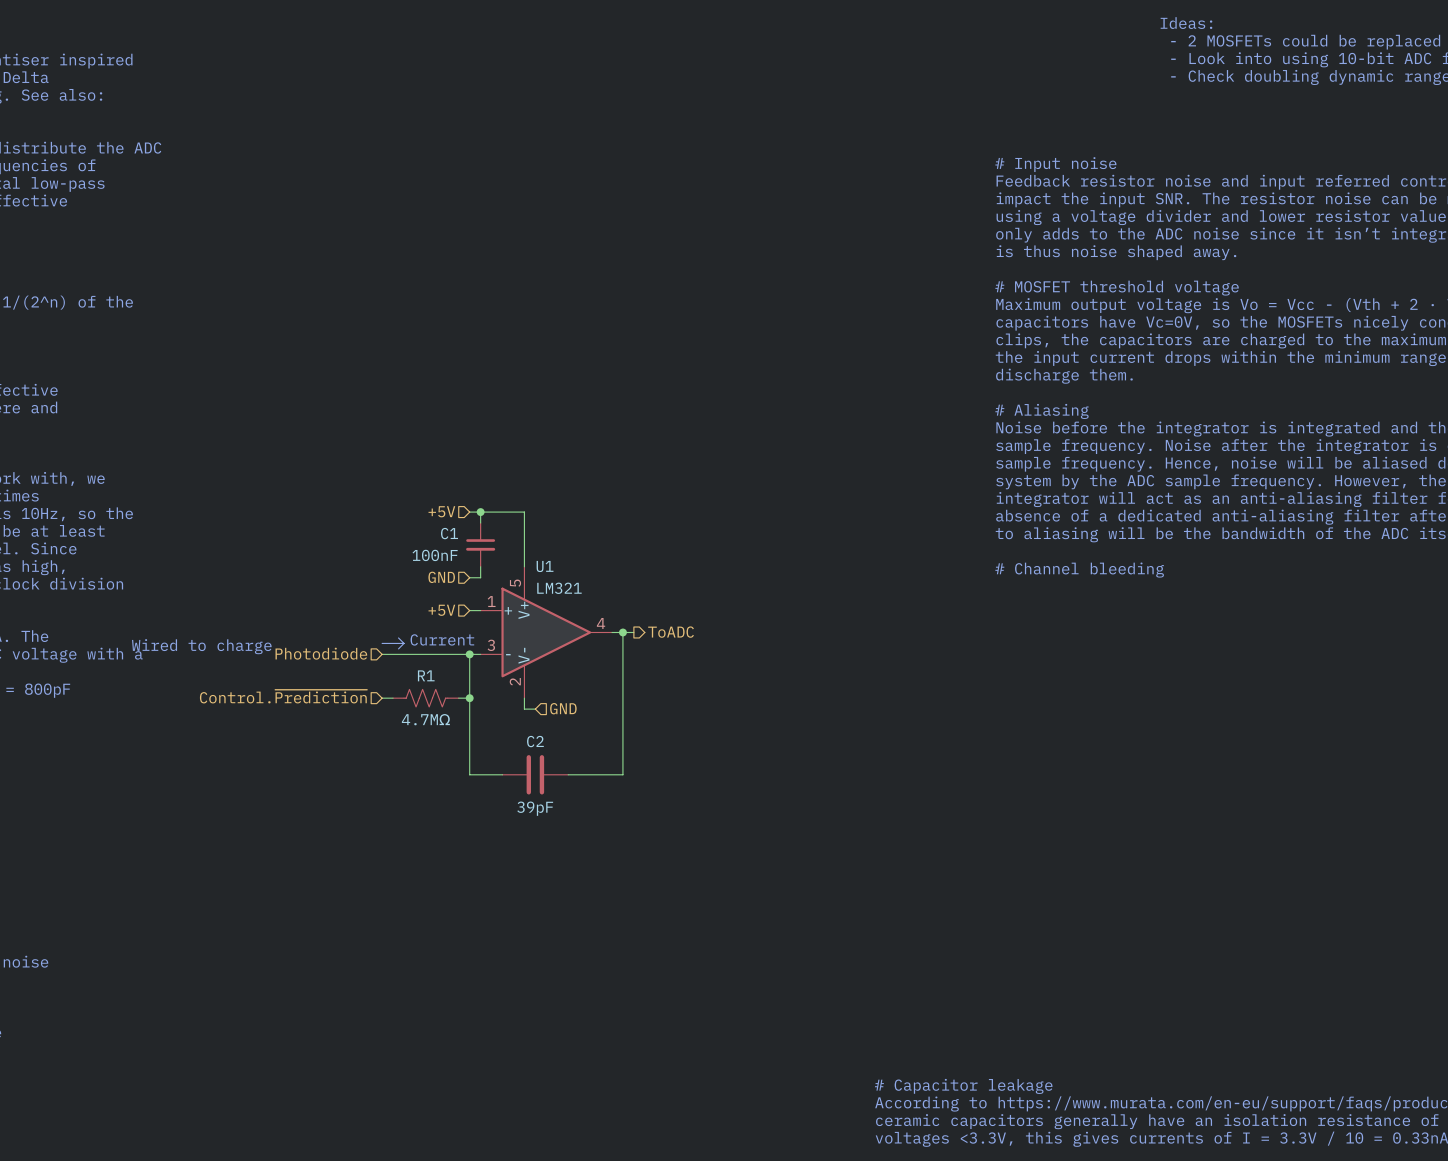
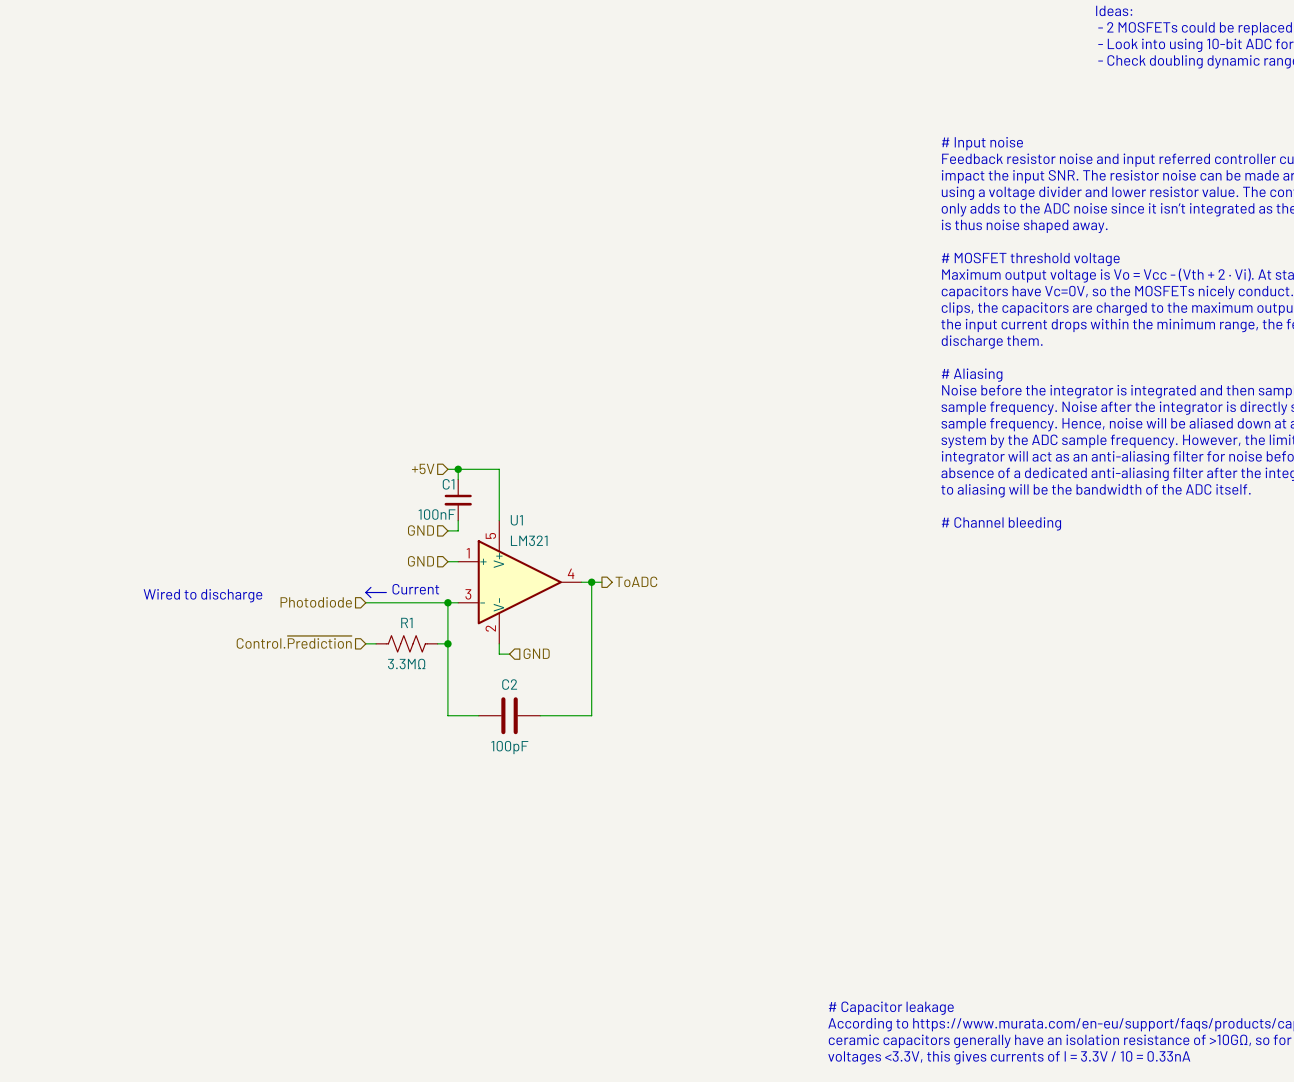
C1 name position: C1 (449, 533) -> C1 (448, 484)
C1 value position: 100nF (435, 555) -> 100nF (437, 514)
hierarchical label: +5V (441, 610) -> GND (420, 561)
bus: none -> (370, 587) (365, 592) (370, 597)
bus: (398, 637) (404, 643) (398, 648) -> none
text: Wired to charge (201, 646) -> Wired to discharge (202, 595)
R1 value: 4.7MΩ (425, 719) -> 3.3MΩ (406, 664)
C2 value: 39pF (535, 808) -> 100pF (509, 747)

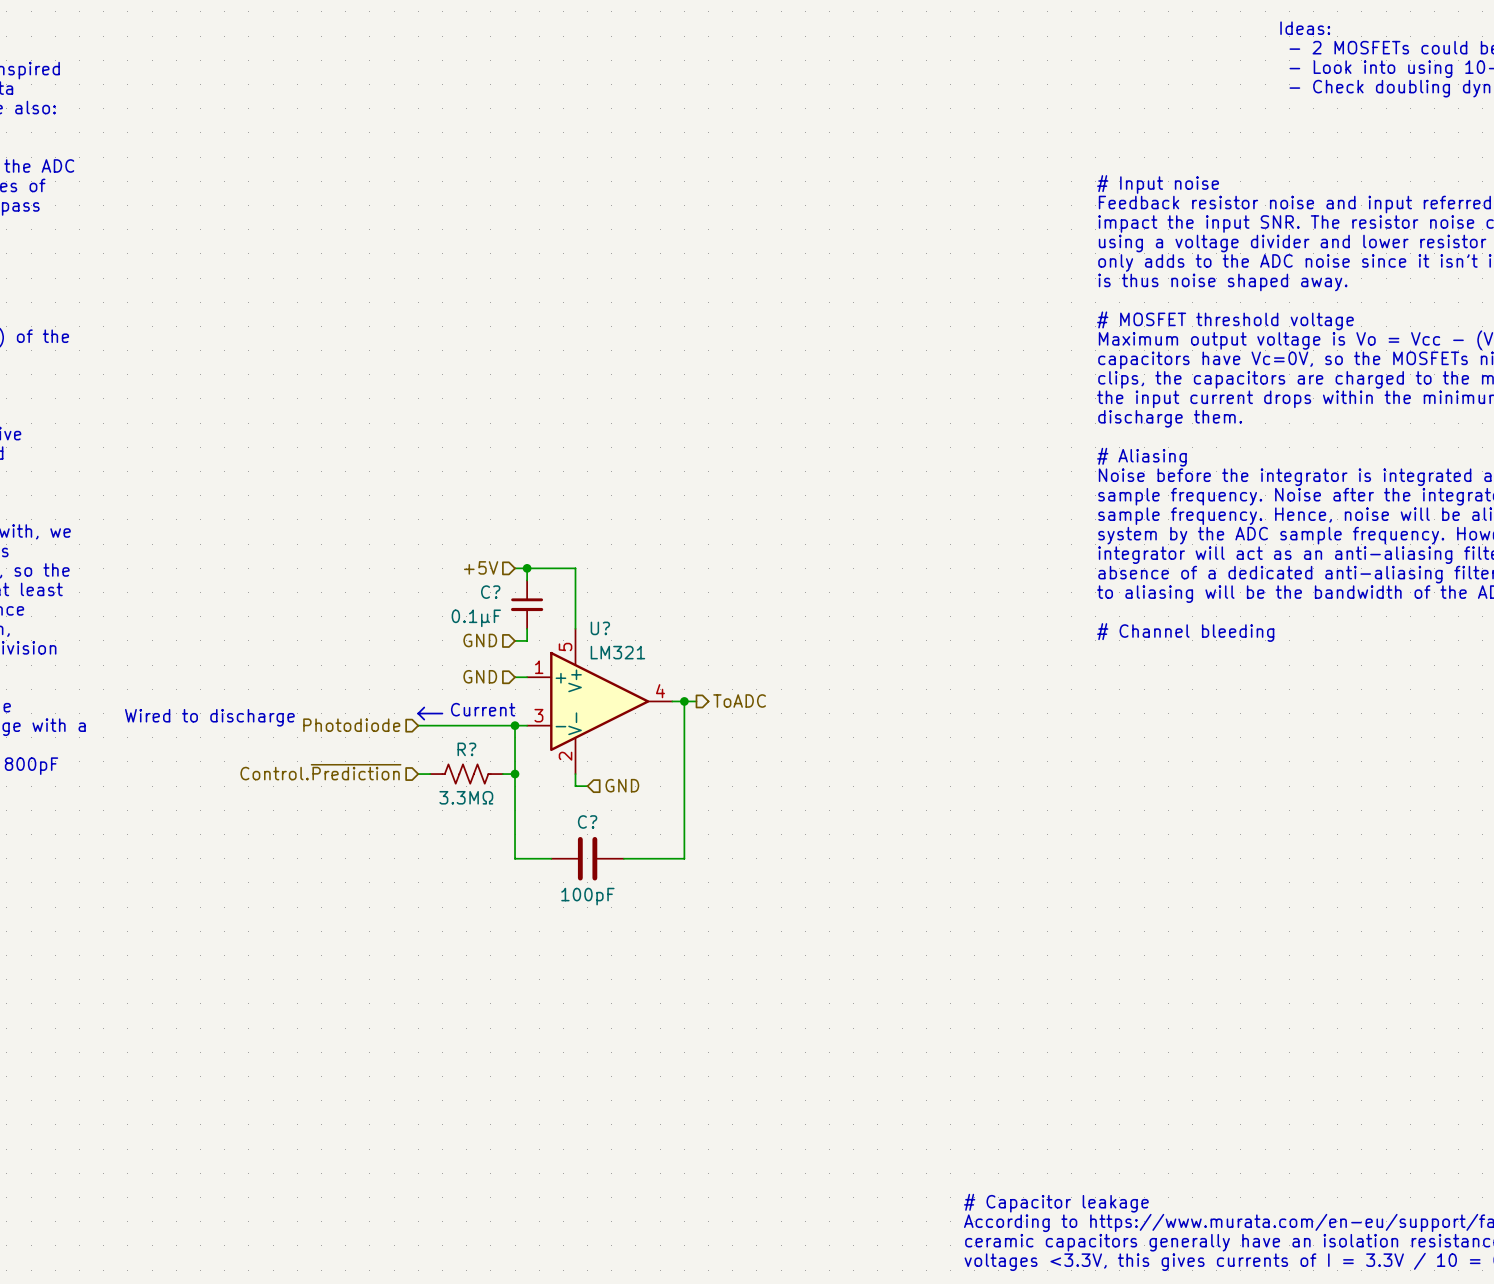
C1 name: C1 (448, 484) -> C? (490, 592)
C1 value: 100nF (437, 514) -> 0.1µF (476, 618)
U1 name: U1 (516, 520) -> U? (600, 628)
R1 name: R1 (406, 622) -> R? (466, 749)
C2 name: C2 (509, 684) -> C? (587, 821)

